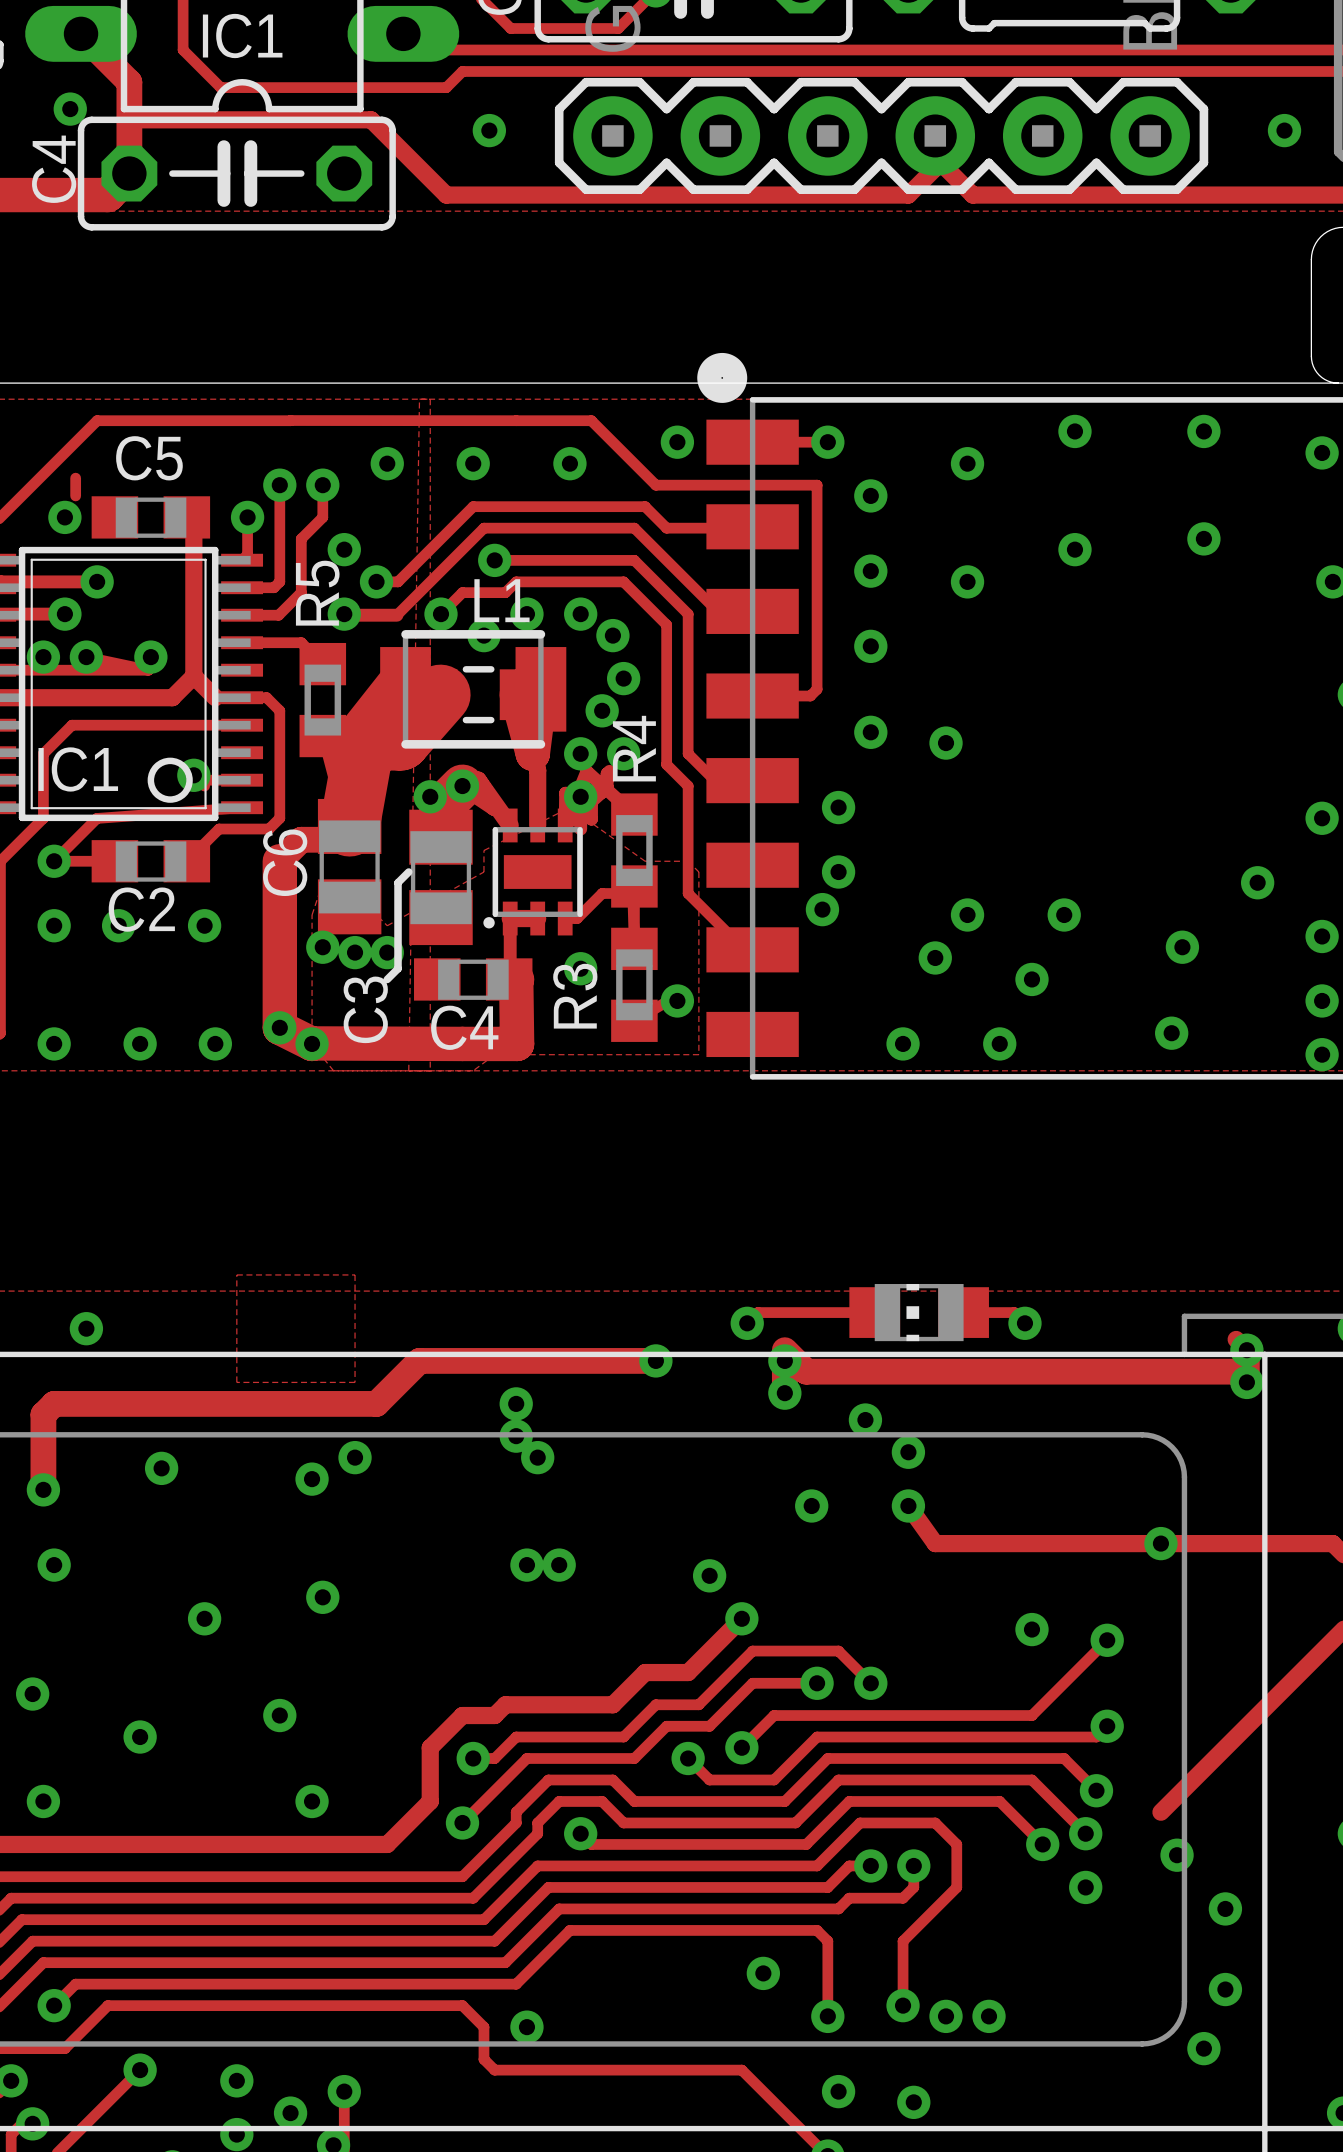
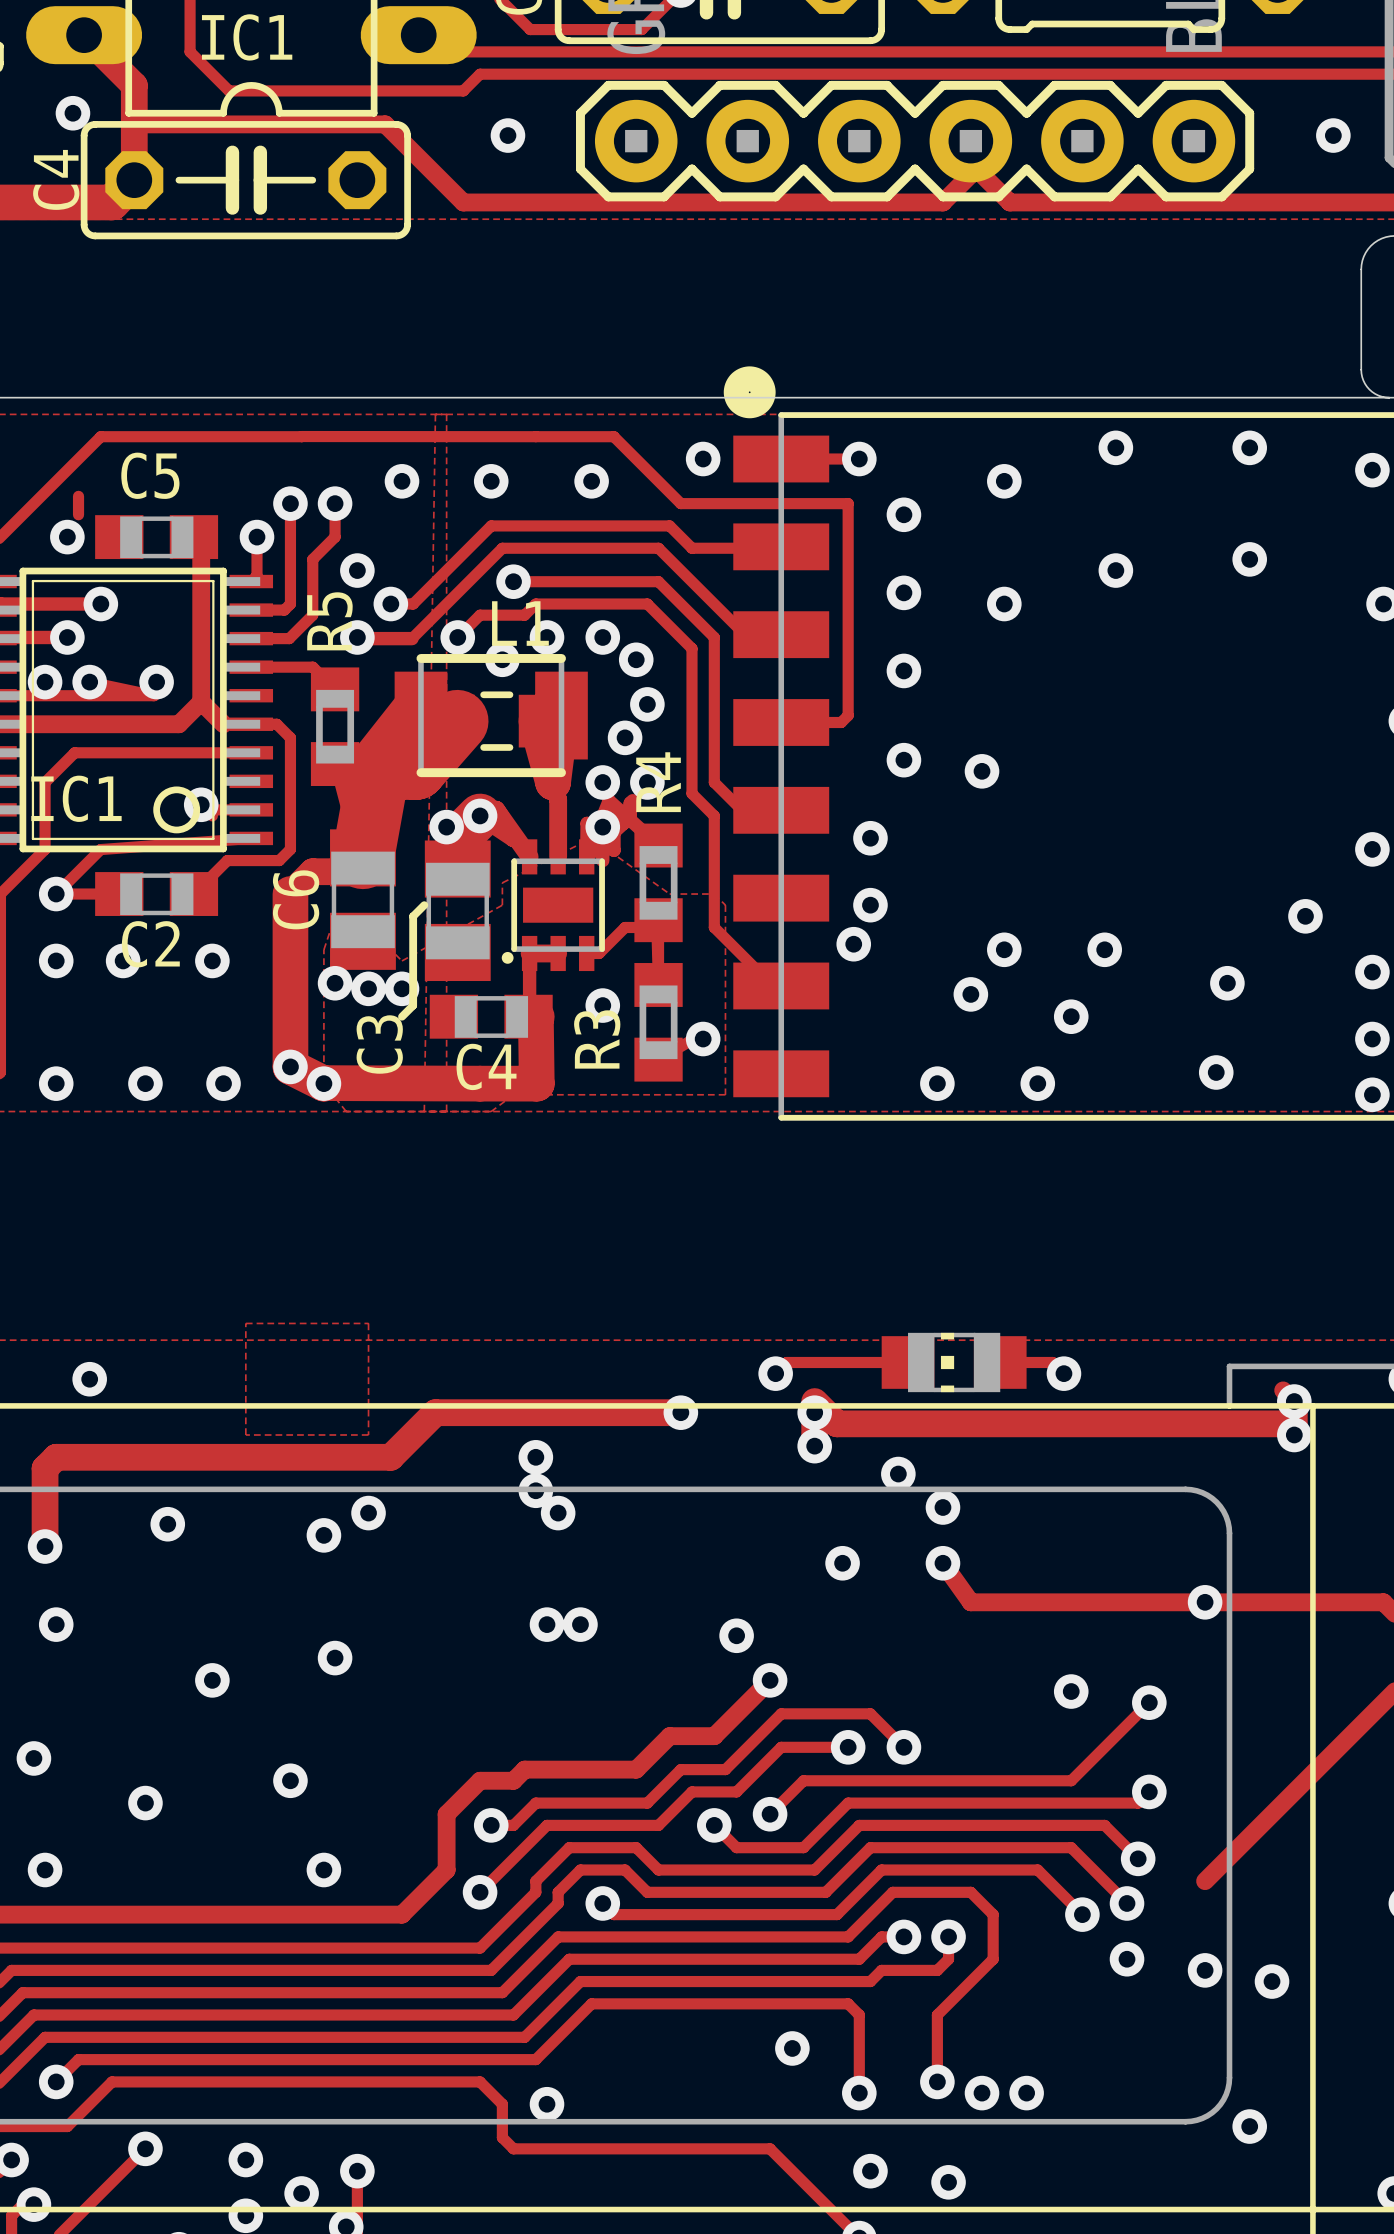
via position: (1177, 1855) -> (1205, 1970)
via: (1225, 1989) -> none

